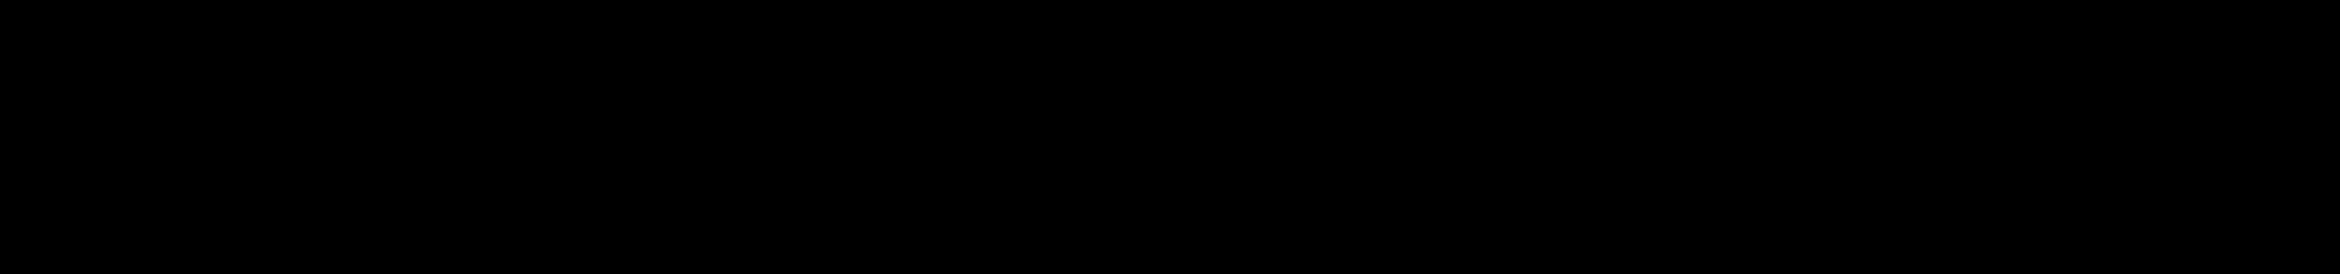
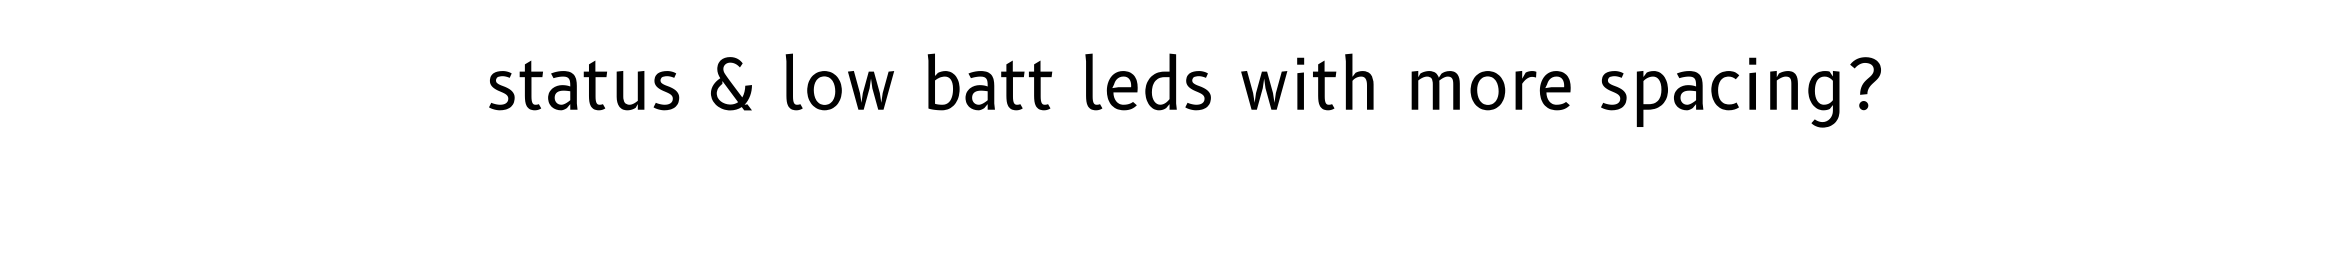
text: none -> status & low batt leds with more spacing? (1185, 90)

